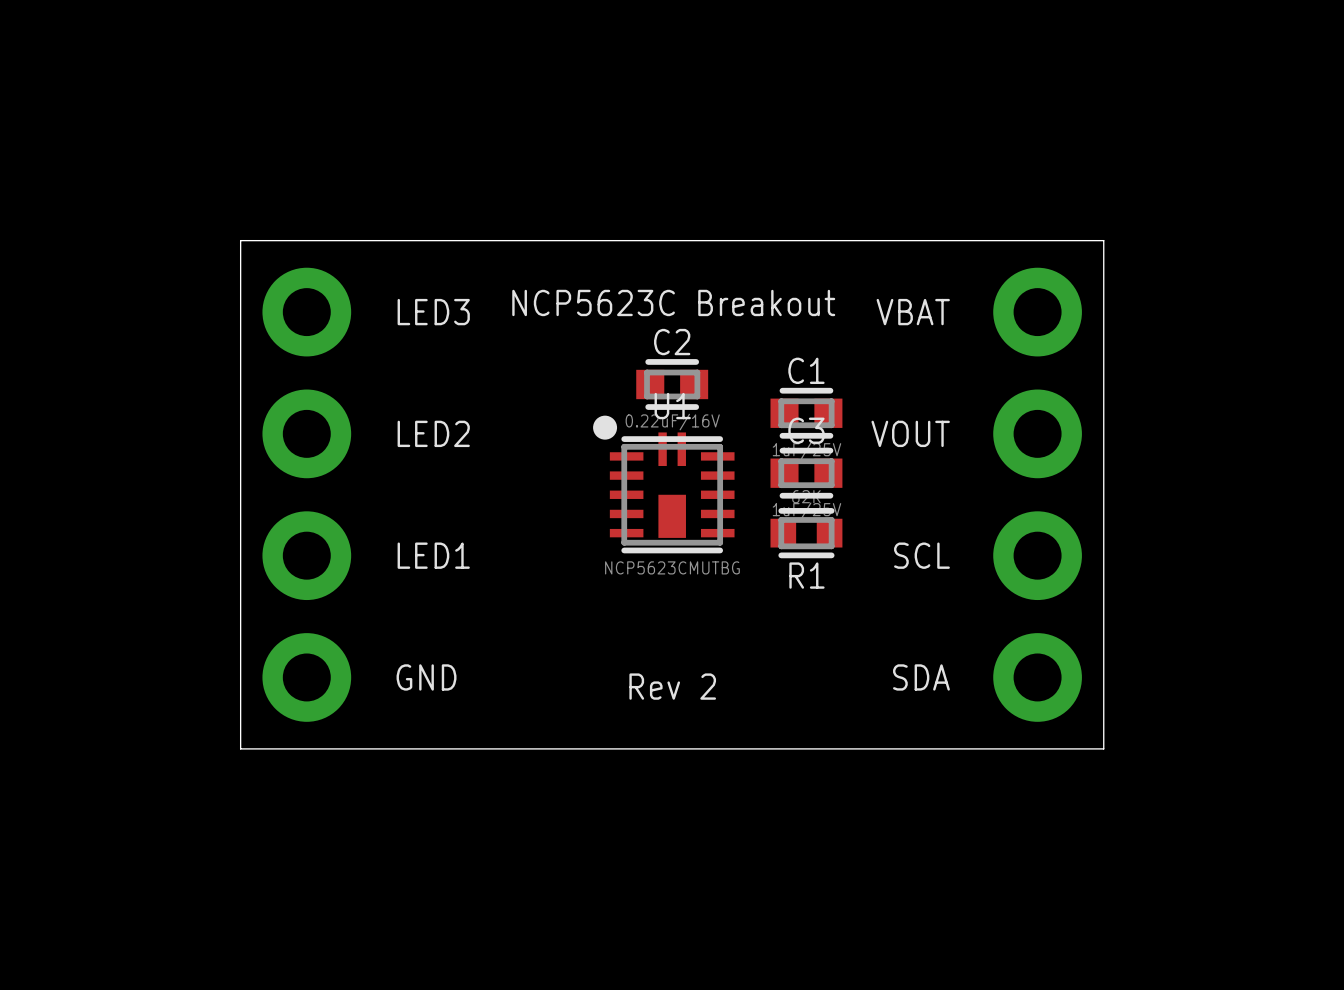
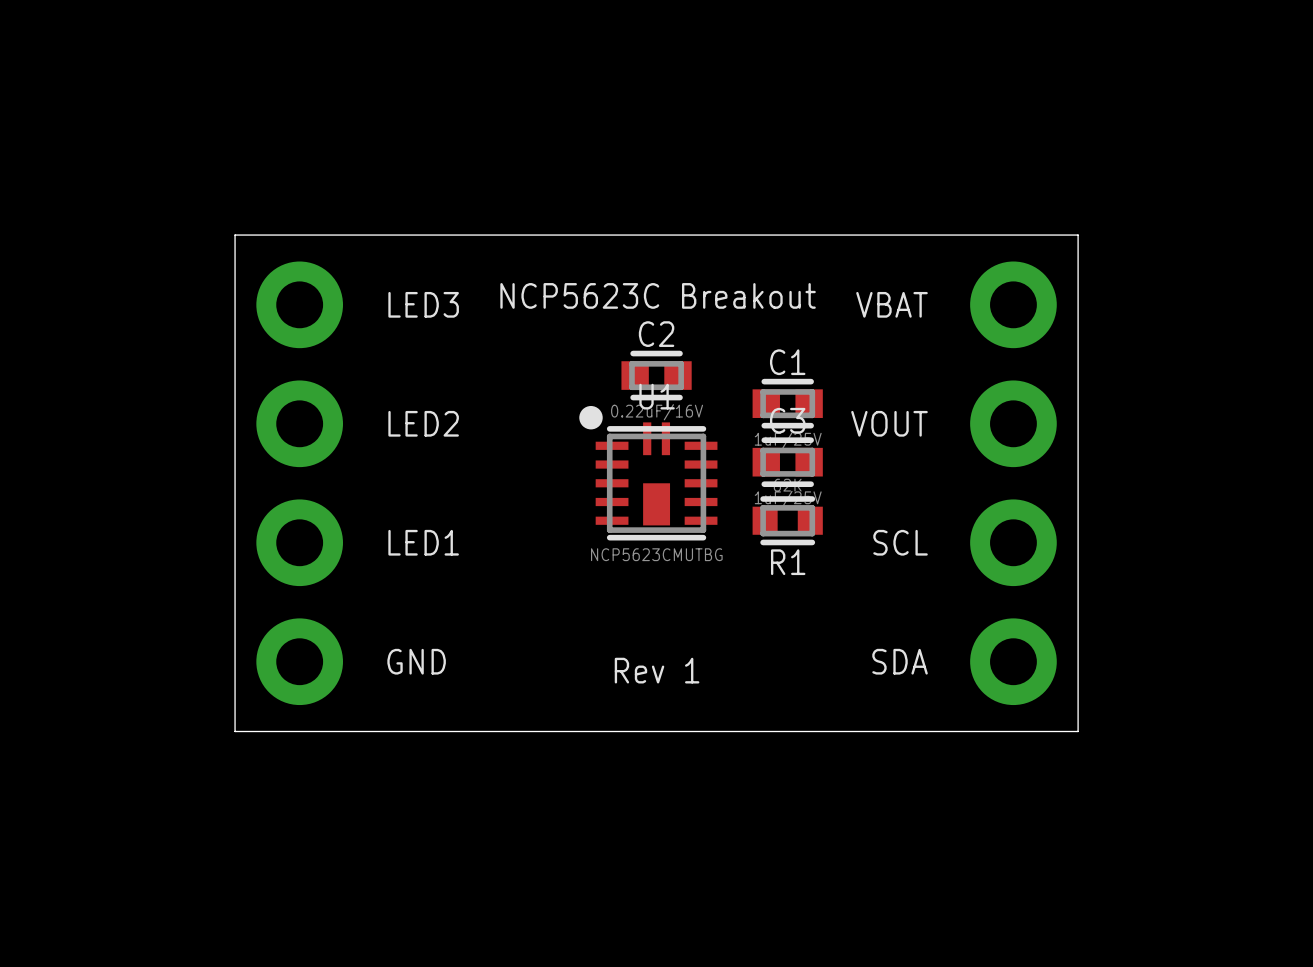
text: Rev 2 (672, 686) -> Rev 1 (657, 670)

